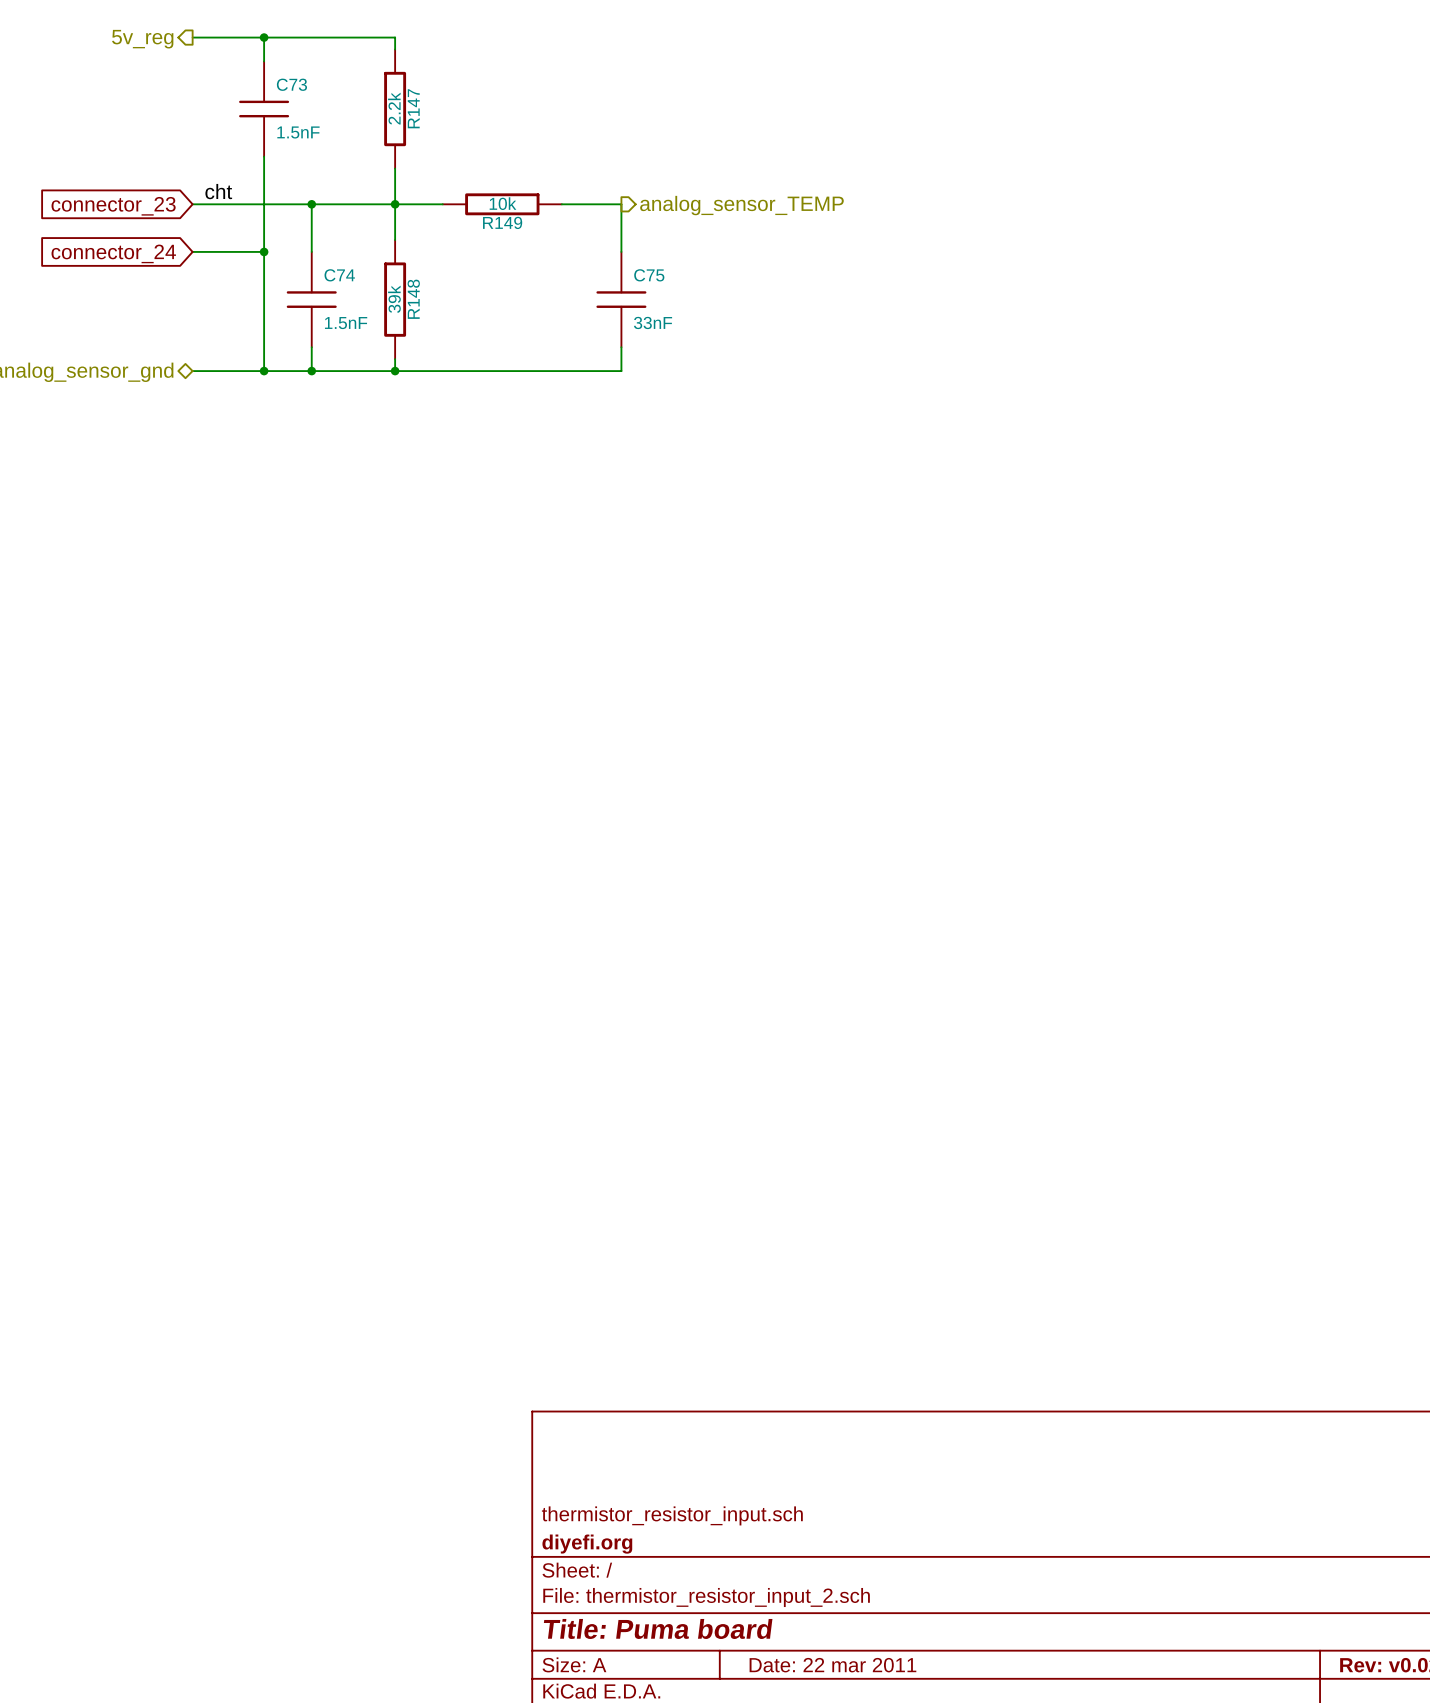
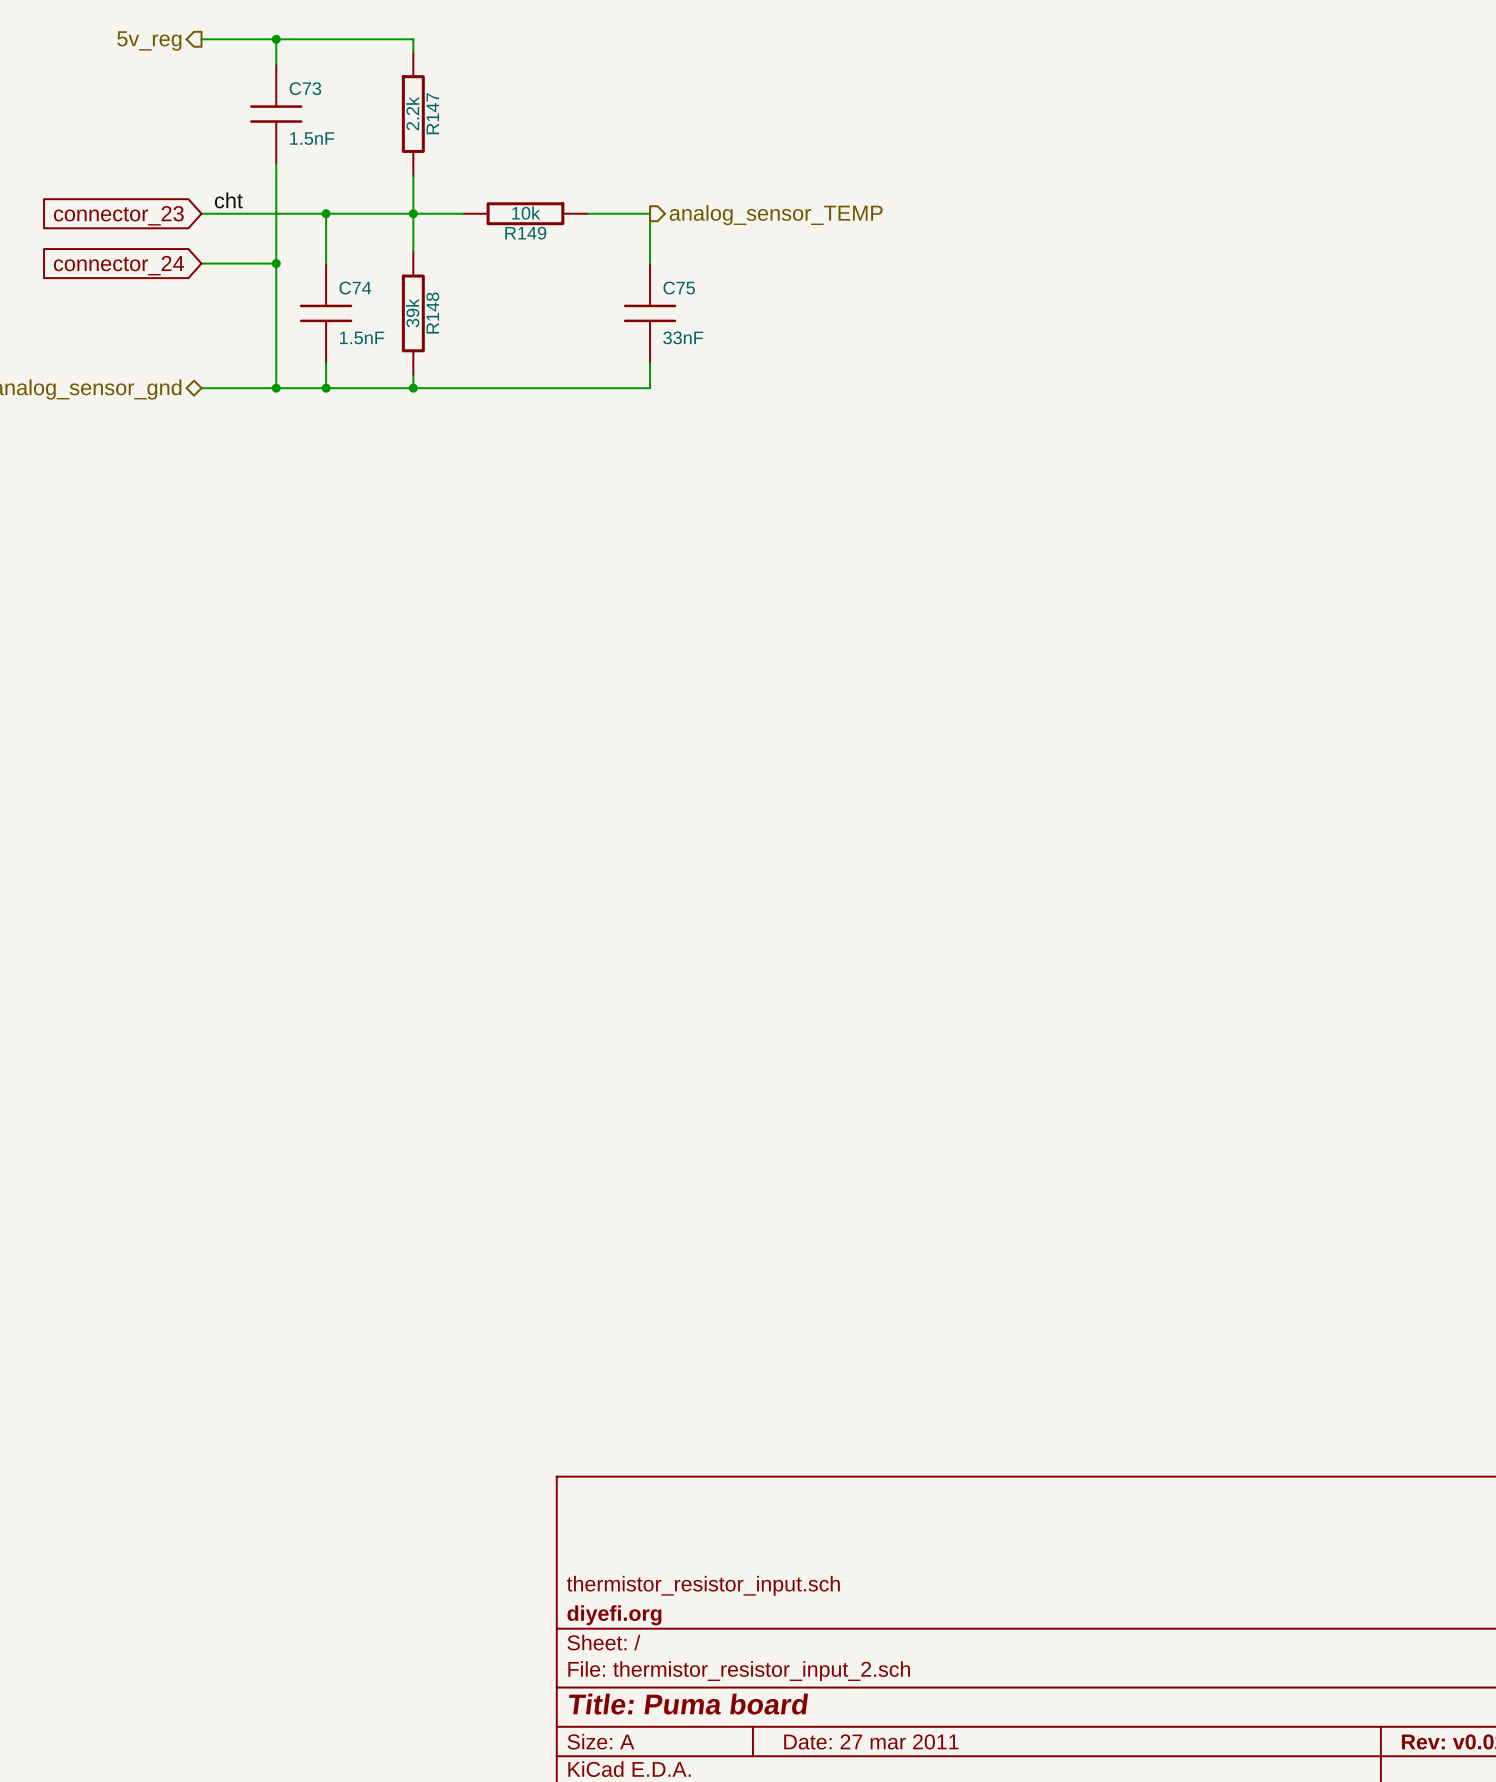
title block: Date: 22 mar 2011 (832, 1665) -> Date: 27 mar 2011 (871, 1741)

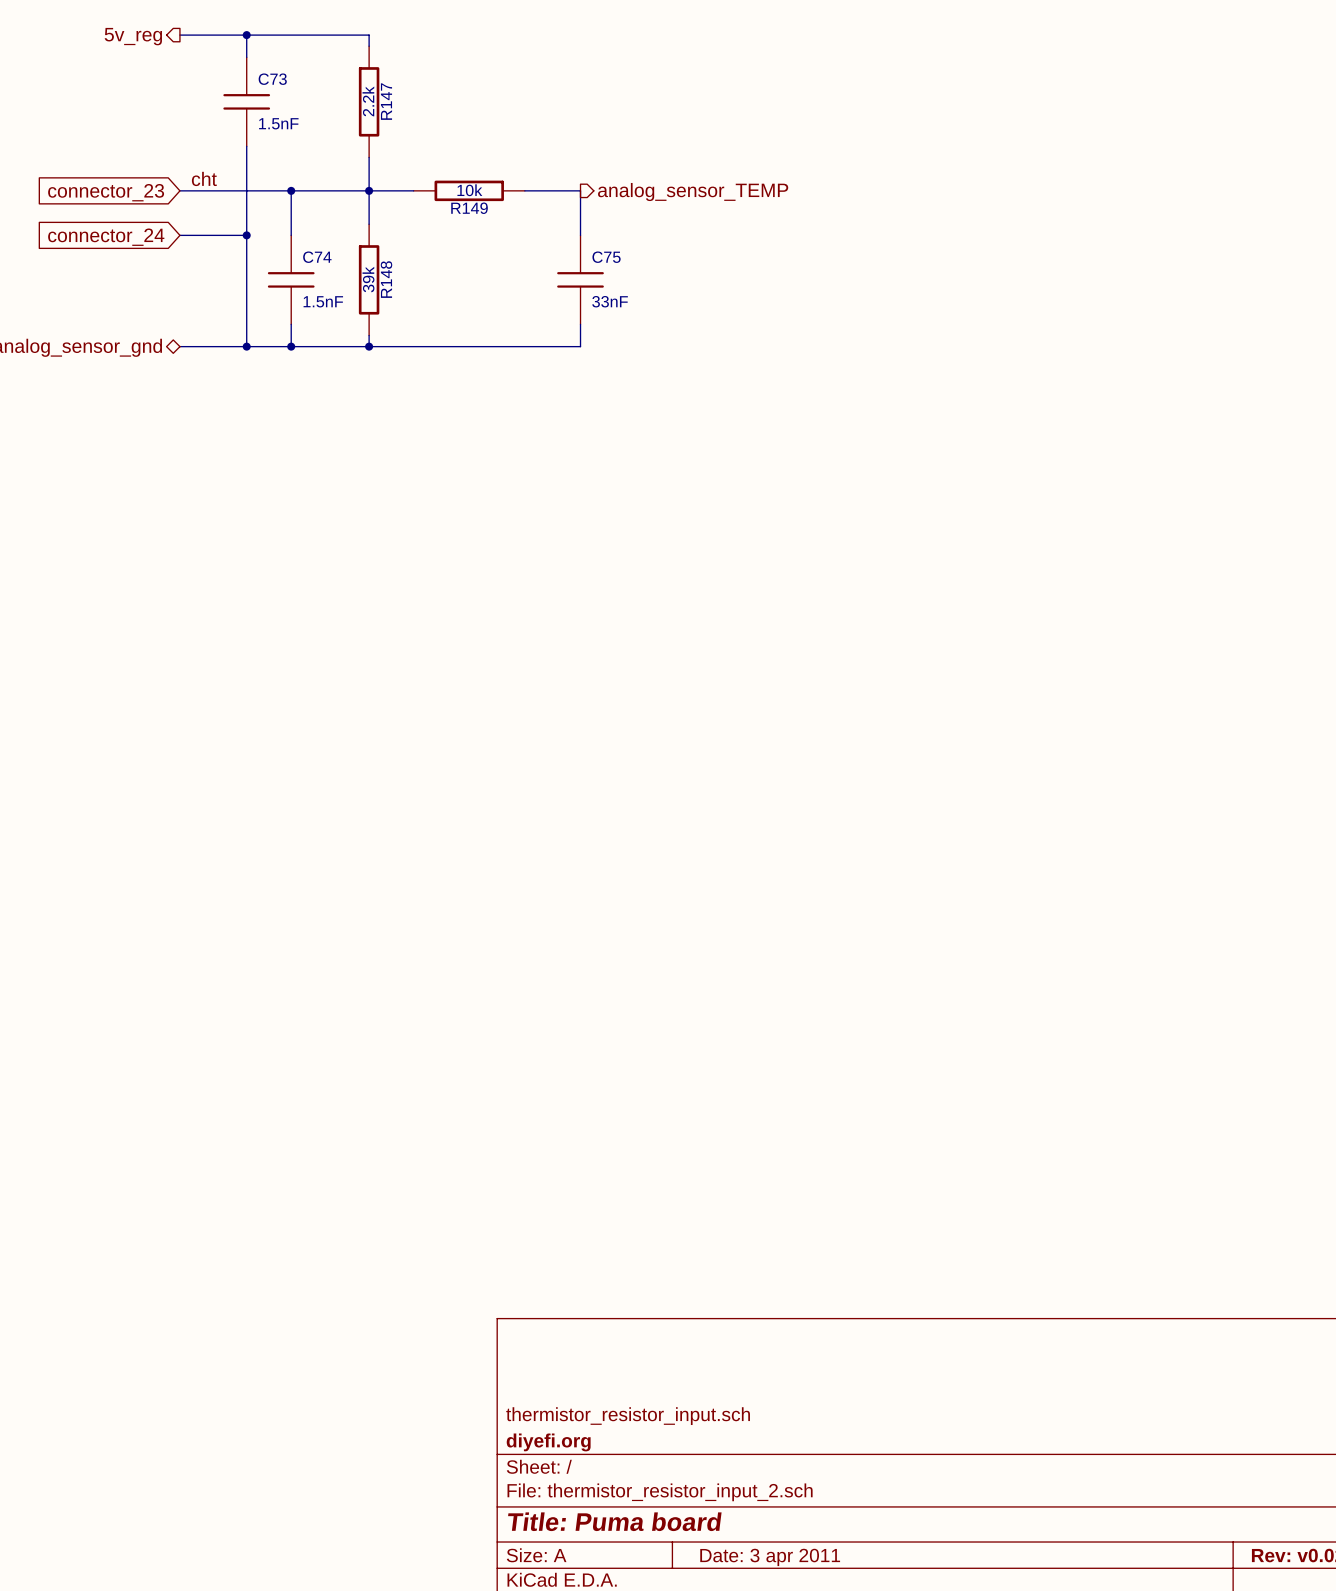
title block: Date: 27 mar 2011 (871, 1741) -> Date: 3 apr 2011 (770, 1557)

